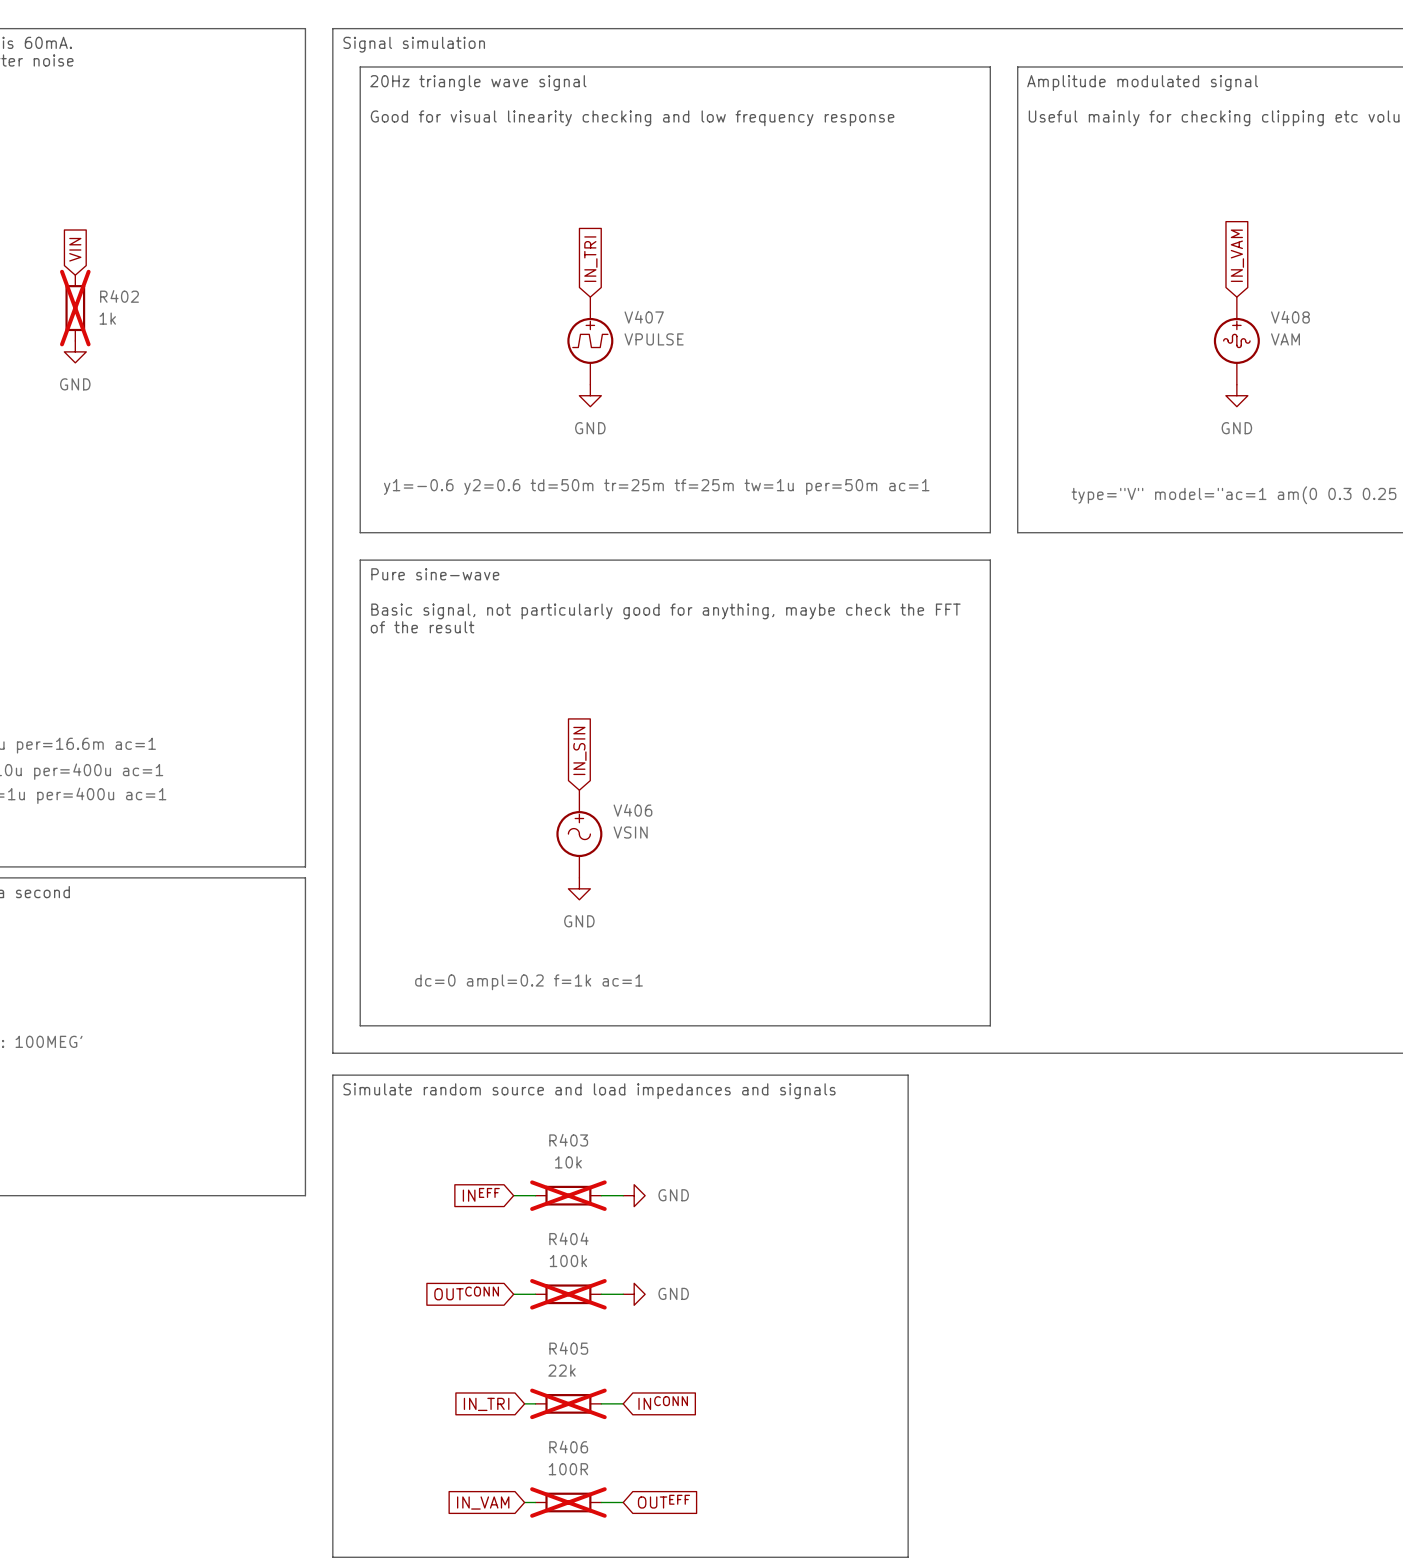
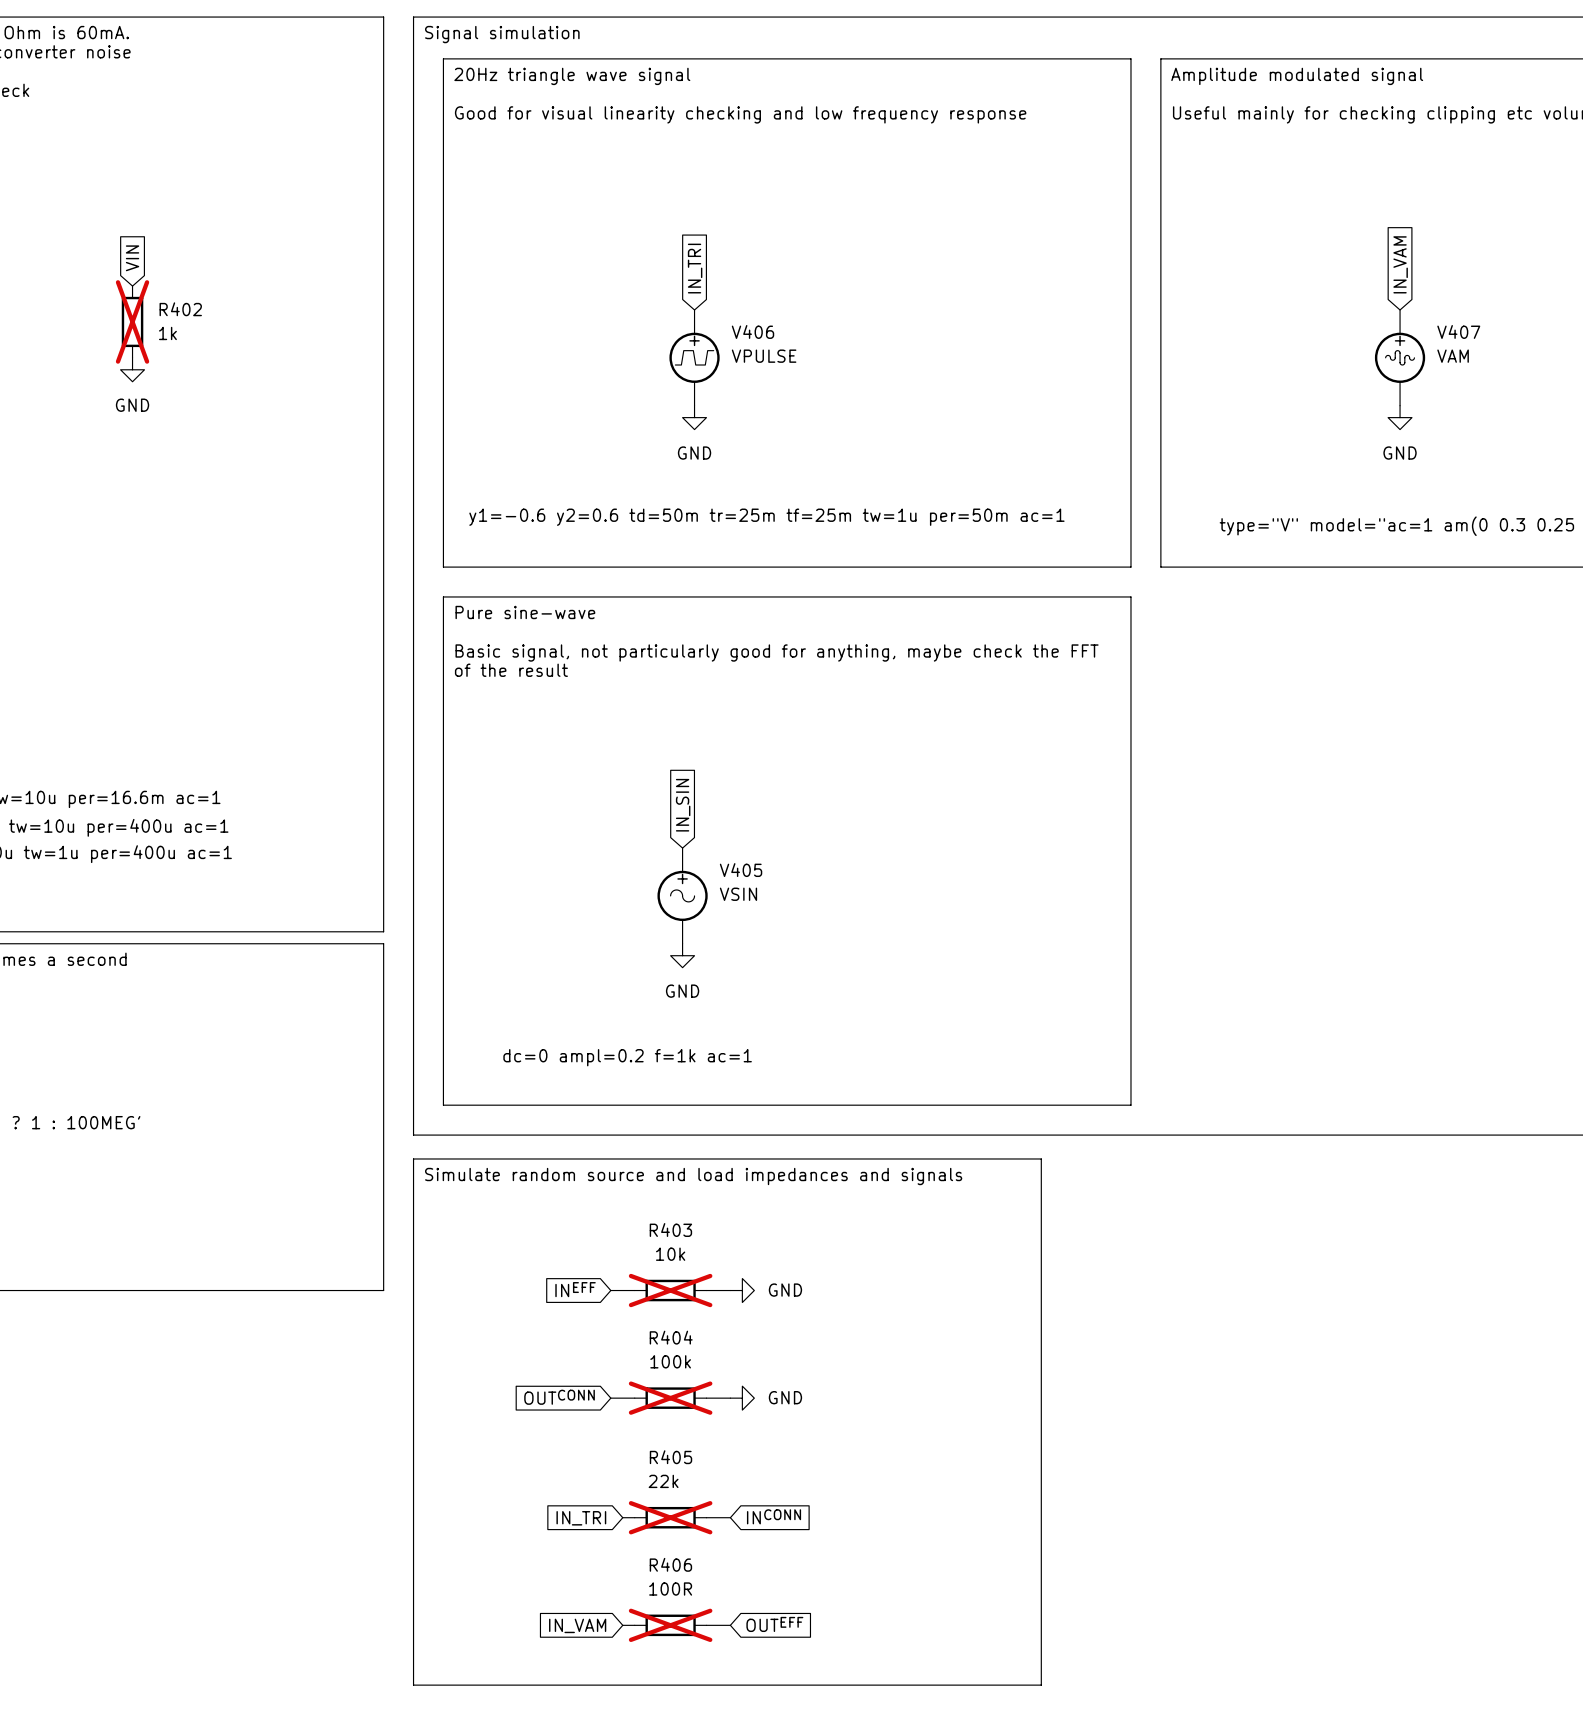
V407 name: V407 (644, 317) -> V406 (752, 331)
V408 name: V408 (1290, 317) -> V407 (1458, 331)
V406 name: V406 (632, 810) -> V405 (741, 870)

